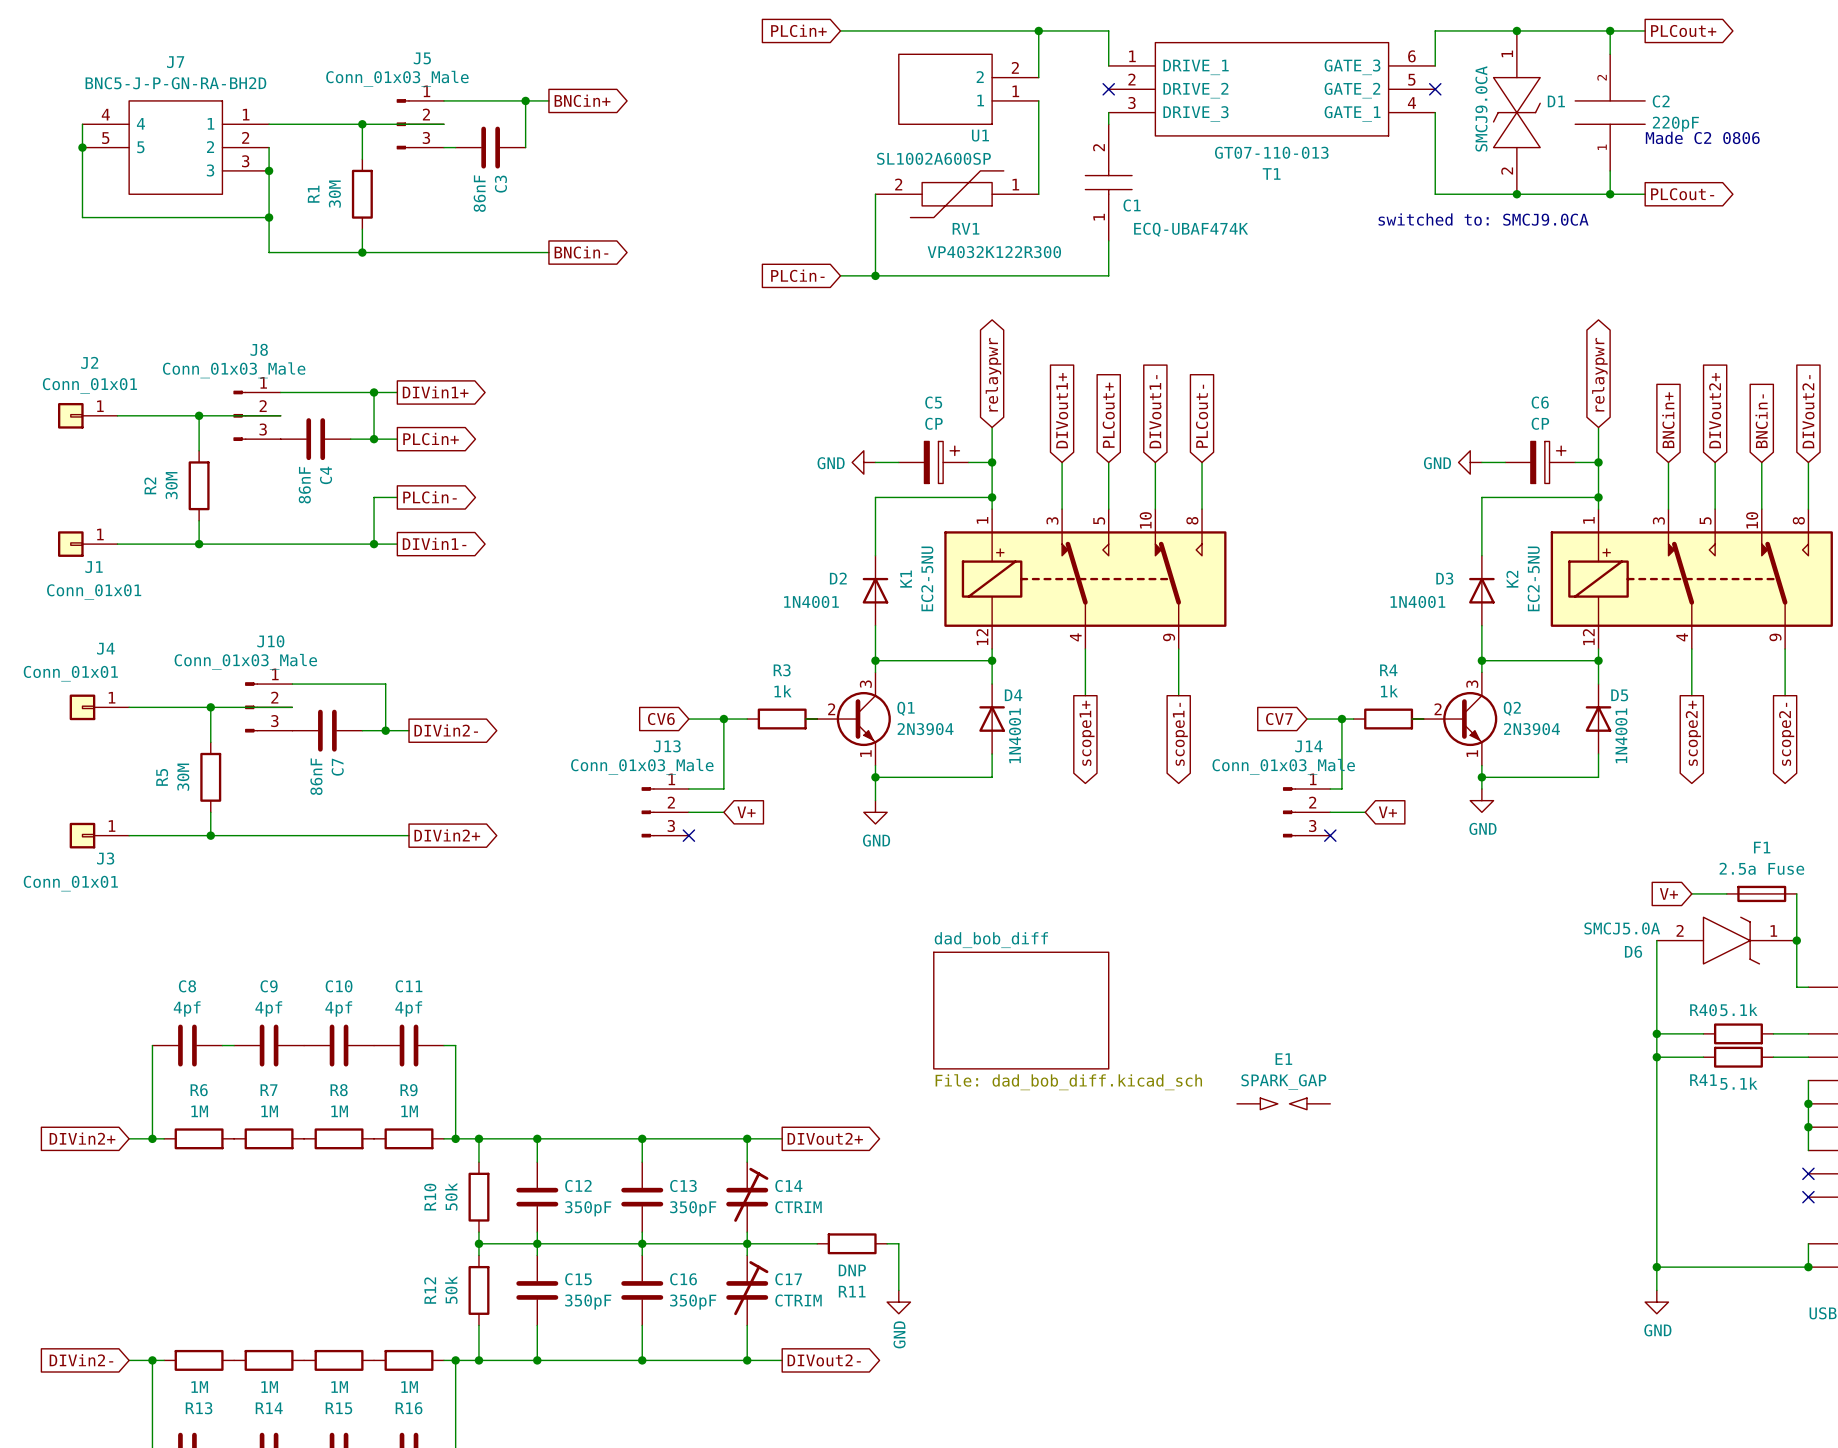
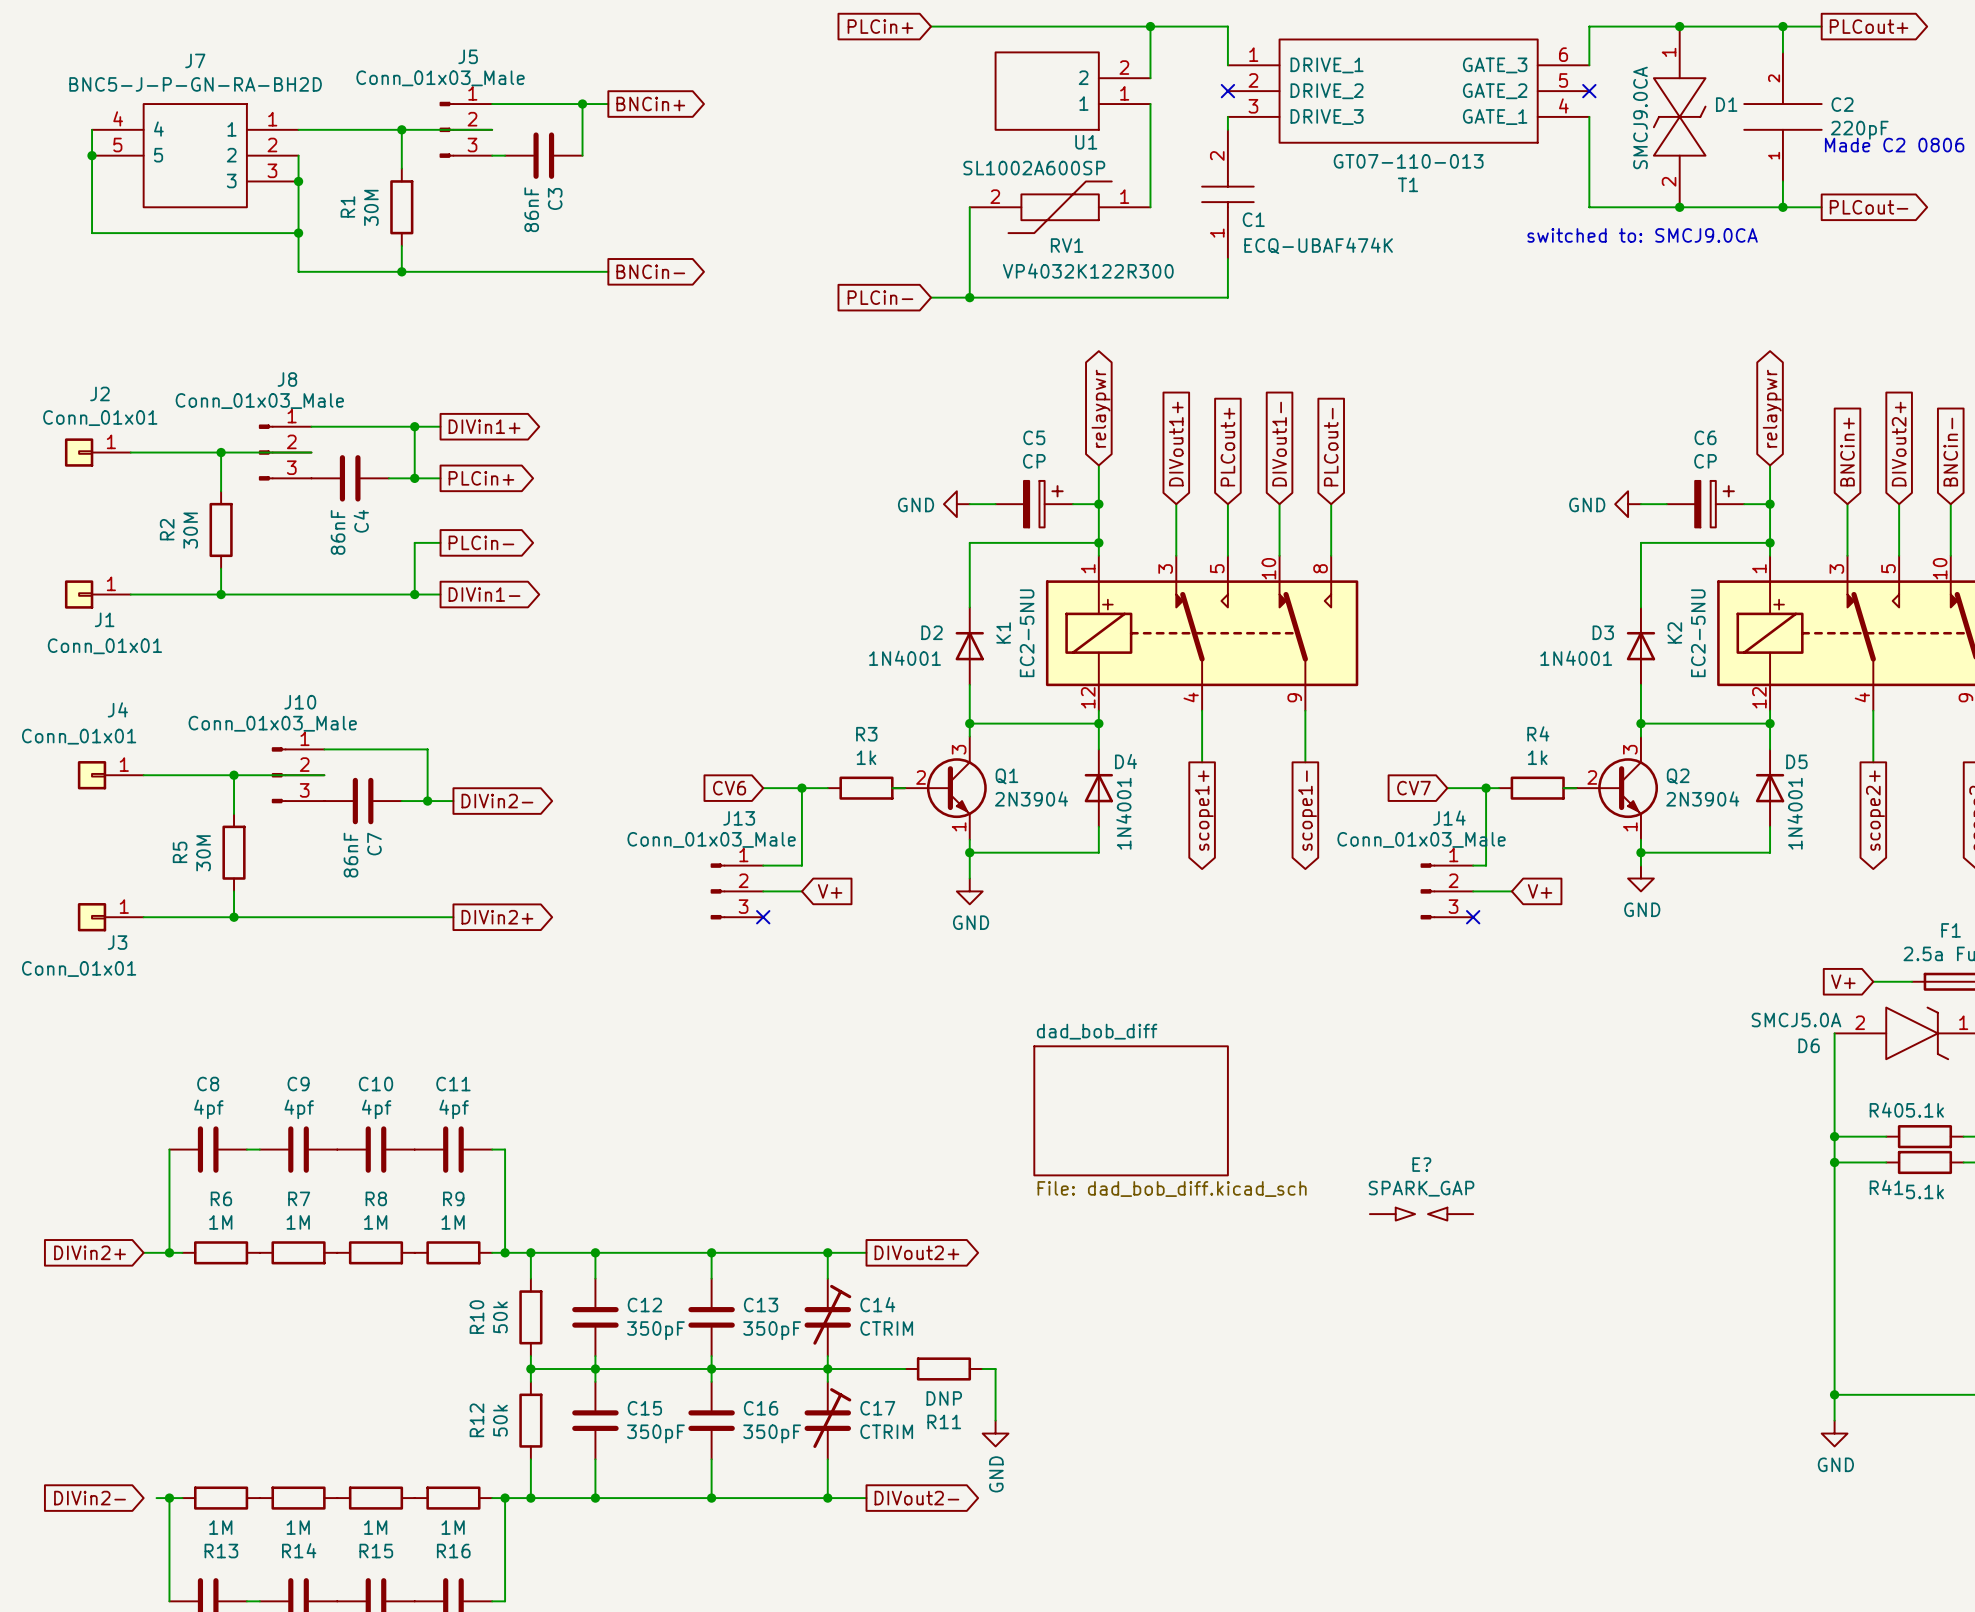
E1 name: E1 (1283, 1059) -> E? (1421, 1164)
wire: (129, 1360) (140, 1360) -> none

